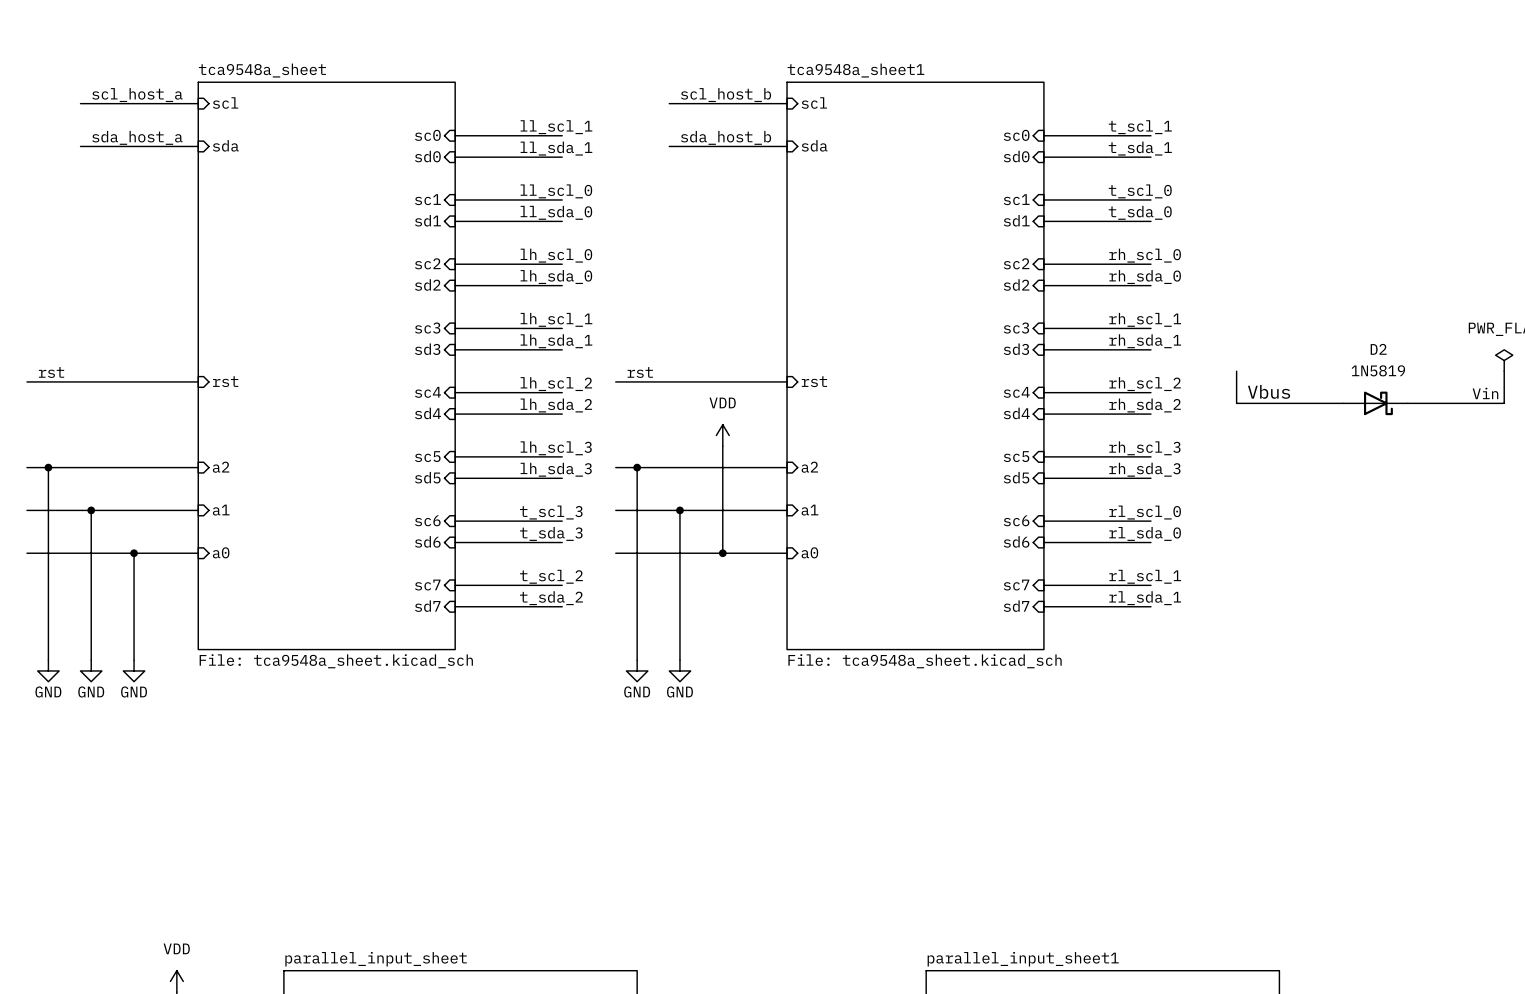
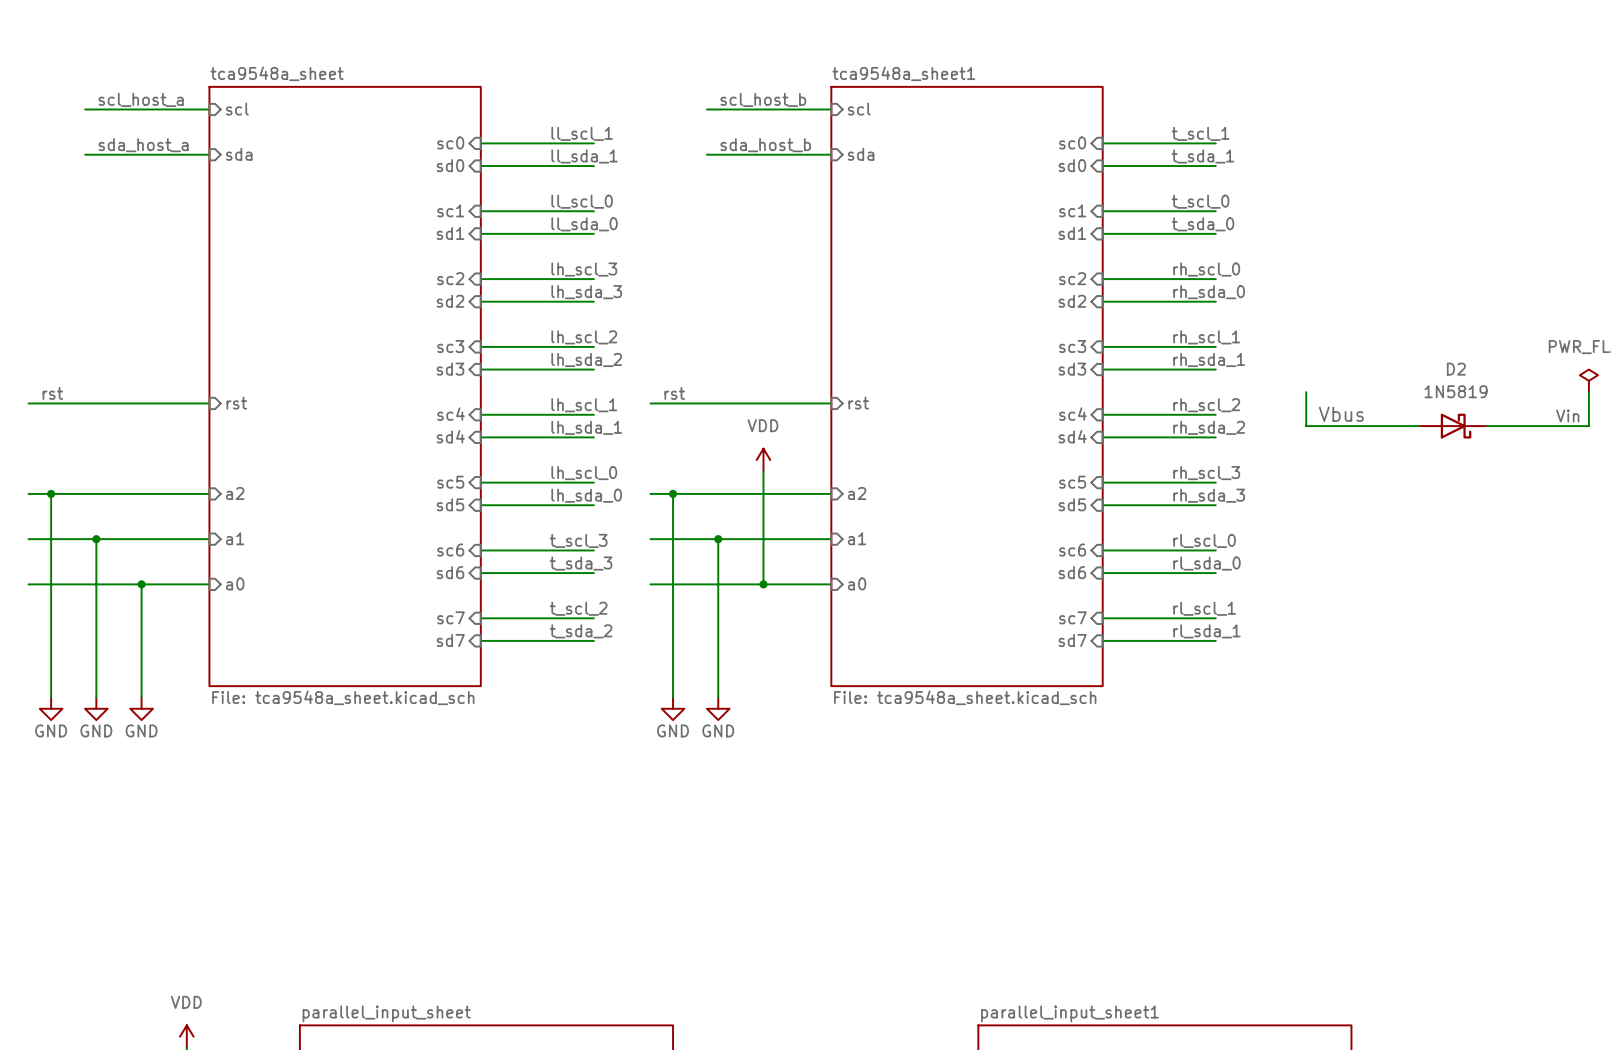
label: lh_scl_0 (556, 255) -> lh_scl_3 (584, 269)
label: lh_sda_0 (556, 277) -> lh_sda_3 (586, 292)
label: lh_scl_1 (556, 319) -> lh_scl_2 (584, 337)
label: lh_sda_1 (556, 341) -> lh_sda_2 (586, 359)
label: lh_scl_2 (556, 384) -> lh_scl_1 (584, 405)
label: lh_sda_2 (556, 405) -> lh_sda_1 (586, 427)
label: lh_scl_3 (556, 448) -> lh_scl_0 (584, 473)
label: lh_sda_3 (556, 469) -> lh_sda_0 (586, 495)

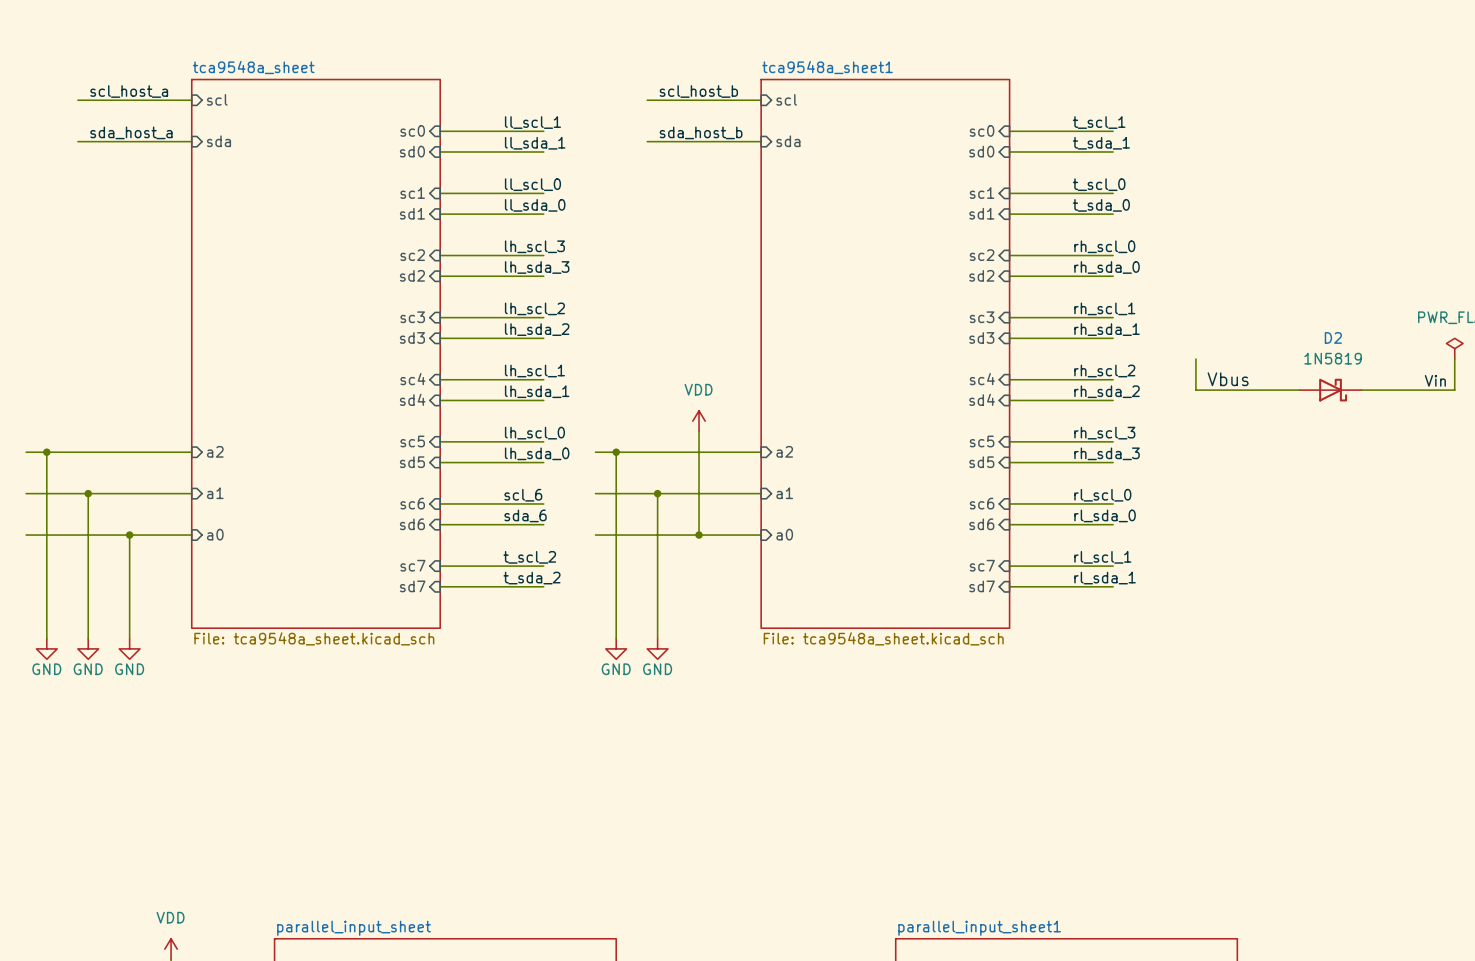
label: rst (52, 393) -> none
label: rst (674, 393) -> none
wire: (28, 403) (209, 403) -> none
sheet pin: rst (236, 403) -> none
wire: (650, 403) (831, 403) -> none
sheet pin: rst (858, 403) -> none
label: t_scl_3 (578, 540) -> scl_6 (523, 495)
label: t_sda_3 (581, 563) -> sda_6 (525, 515)

